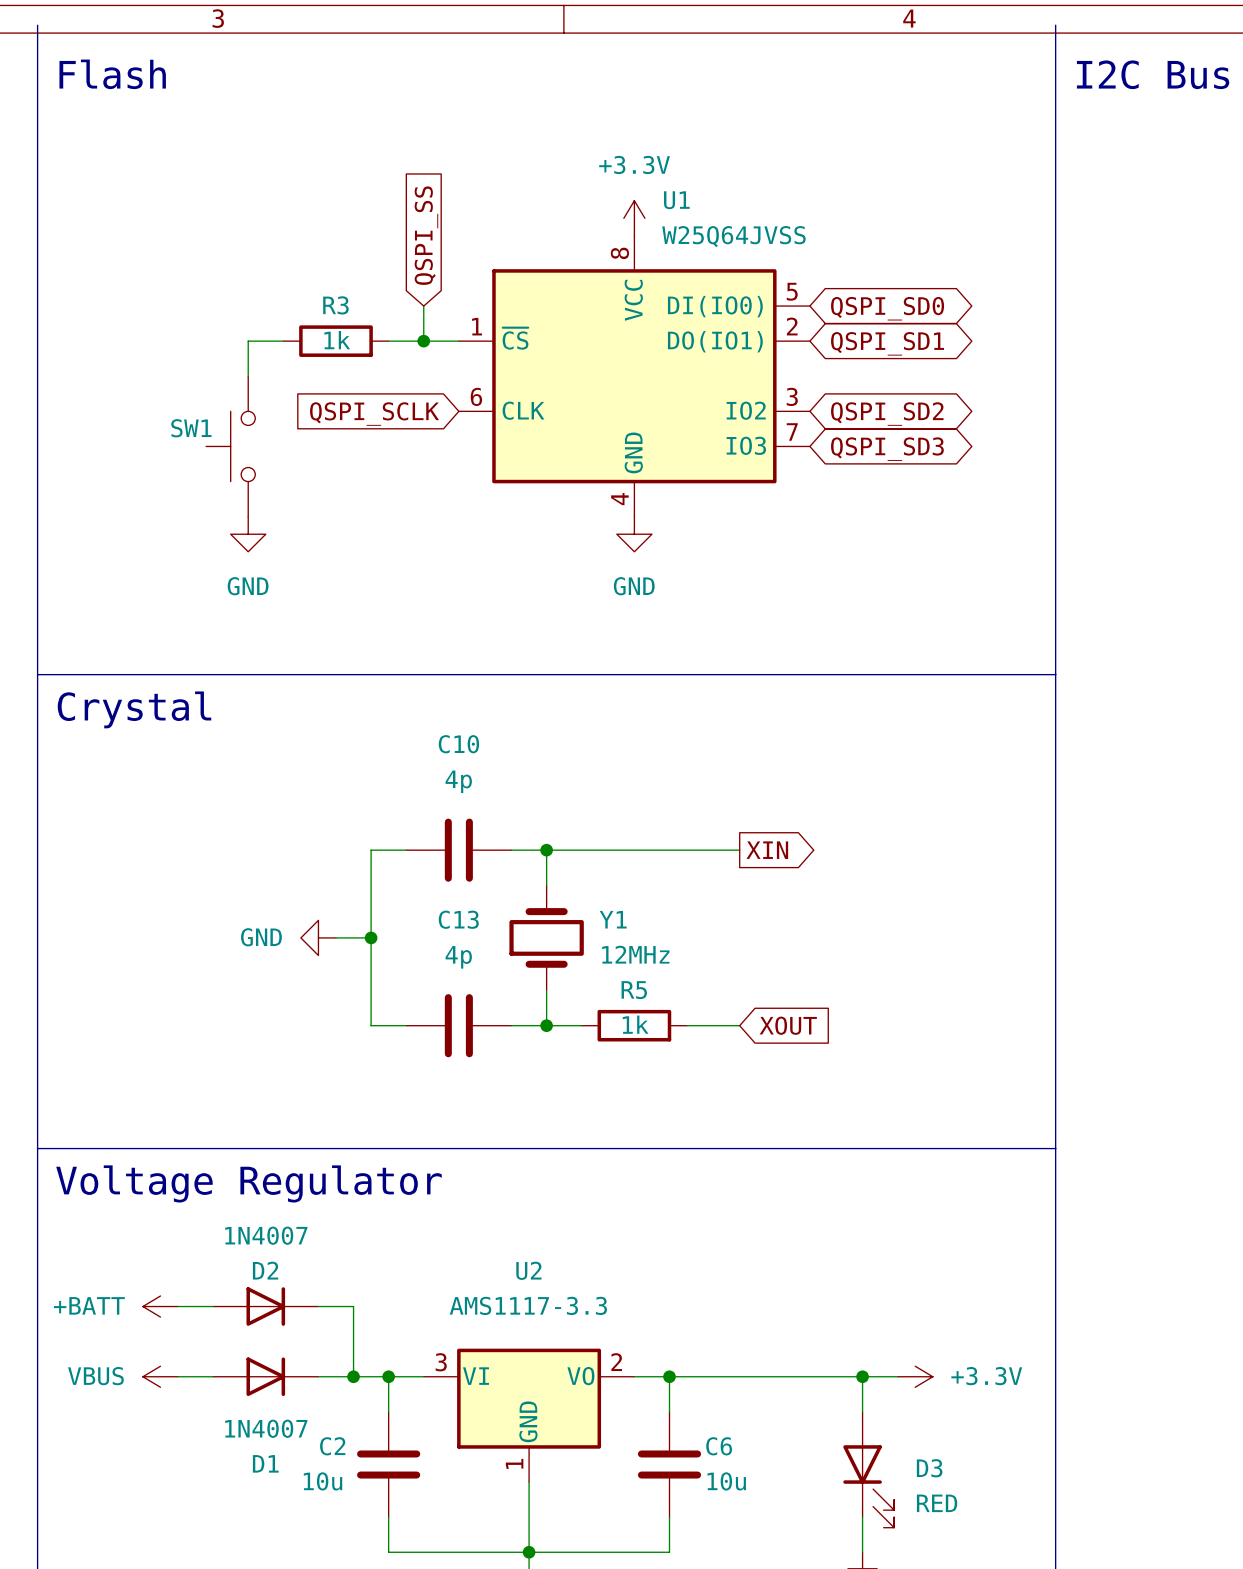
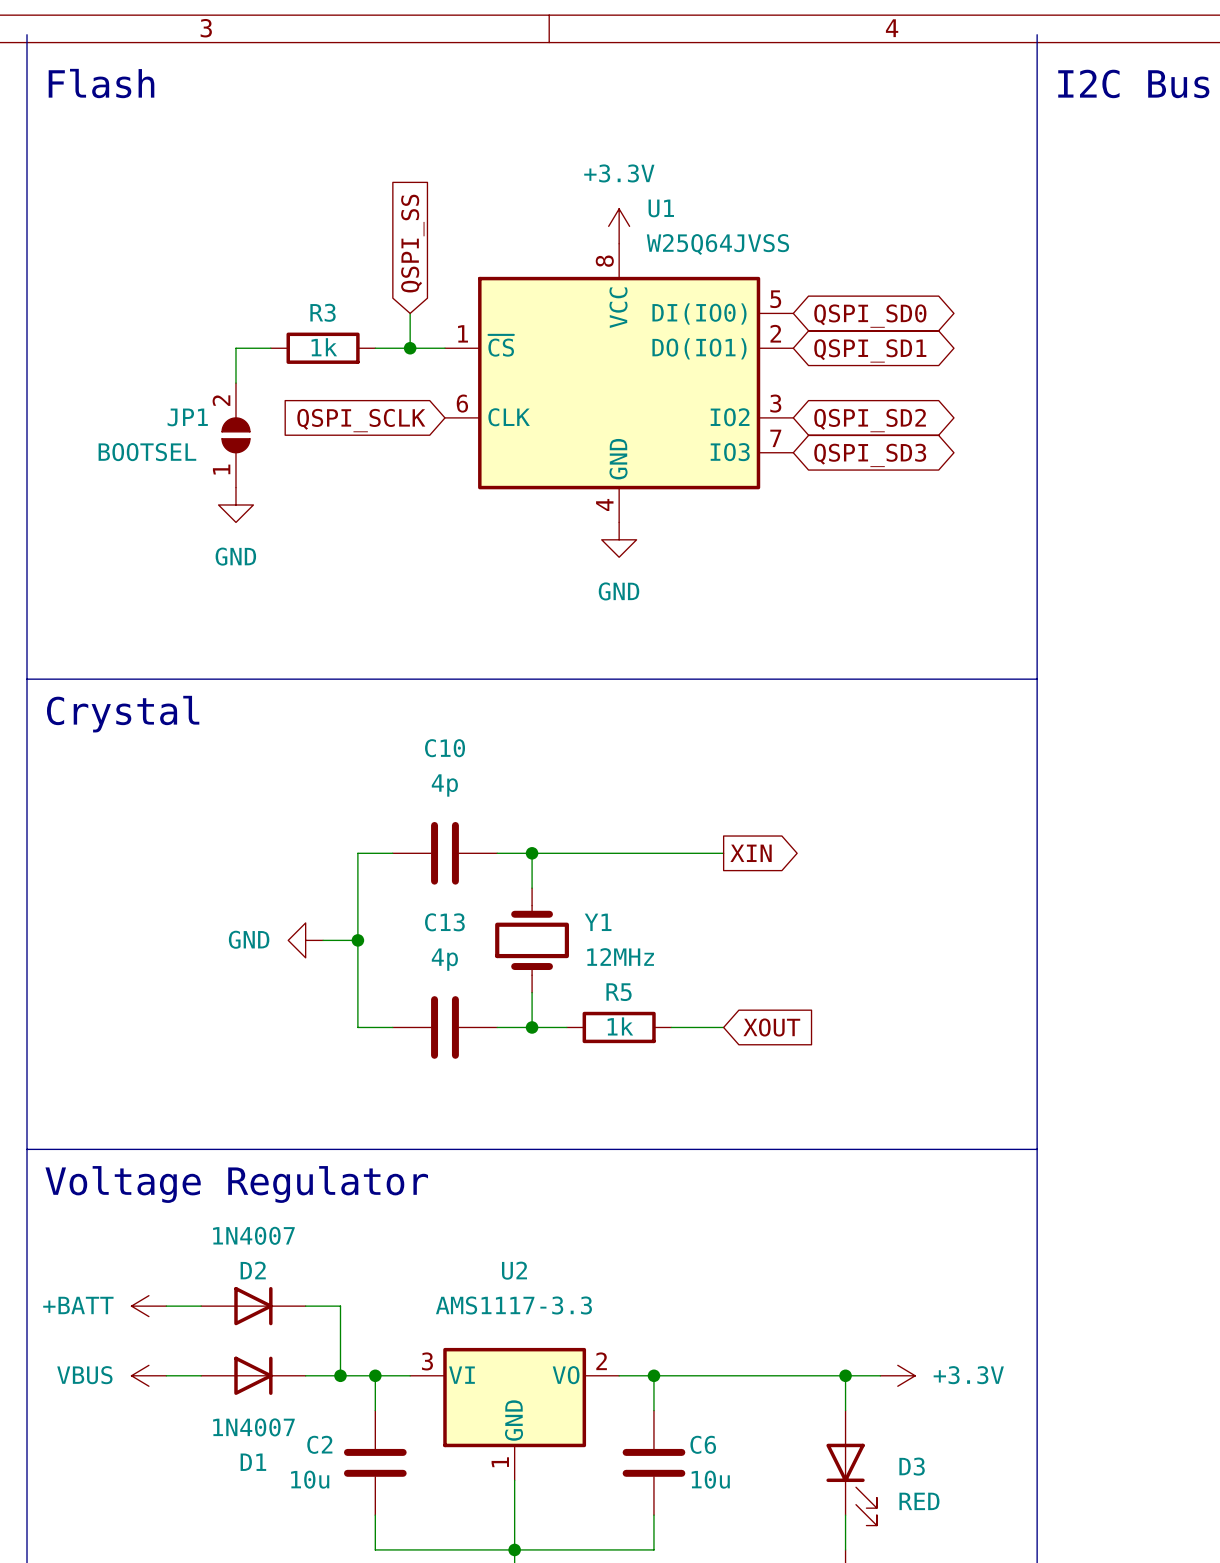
JP1: none -> BOOTSEL (235, 435)
SW1: (230, 446) -> none
power symbol position: GND (248, 534) -> GND (235, 504)

